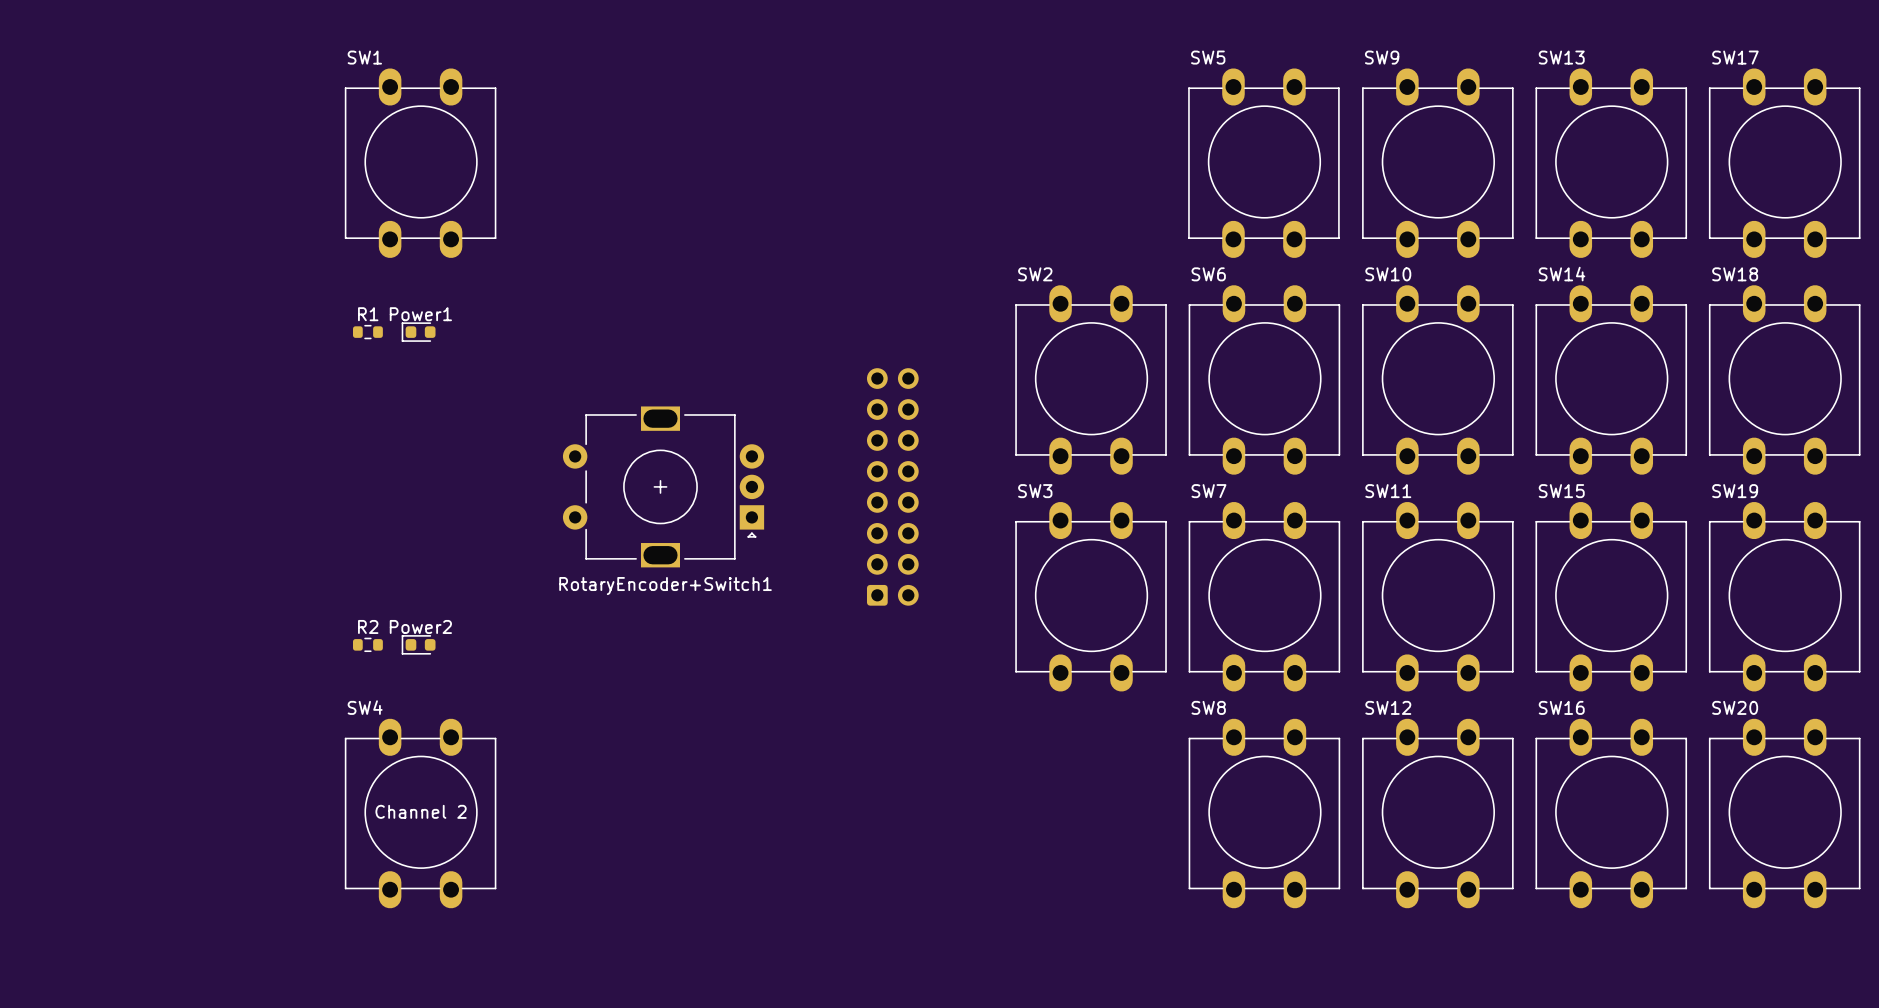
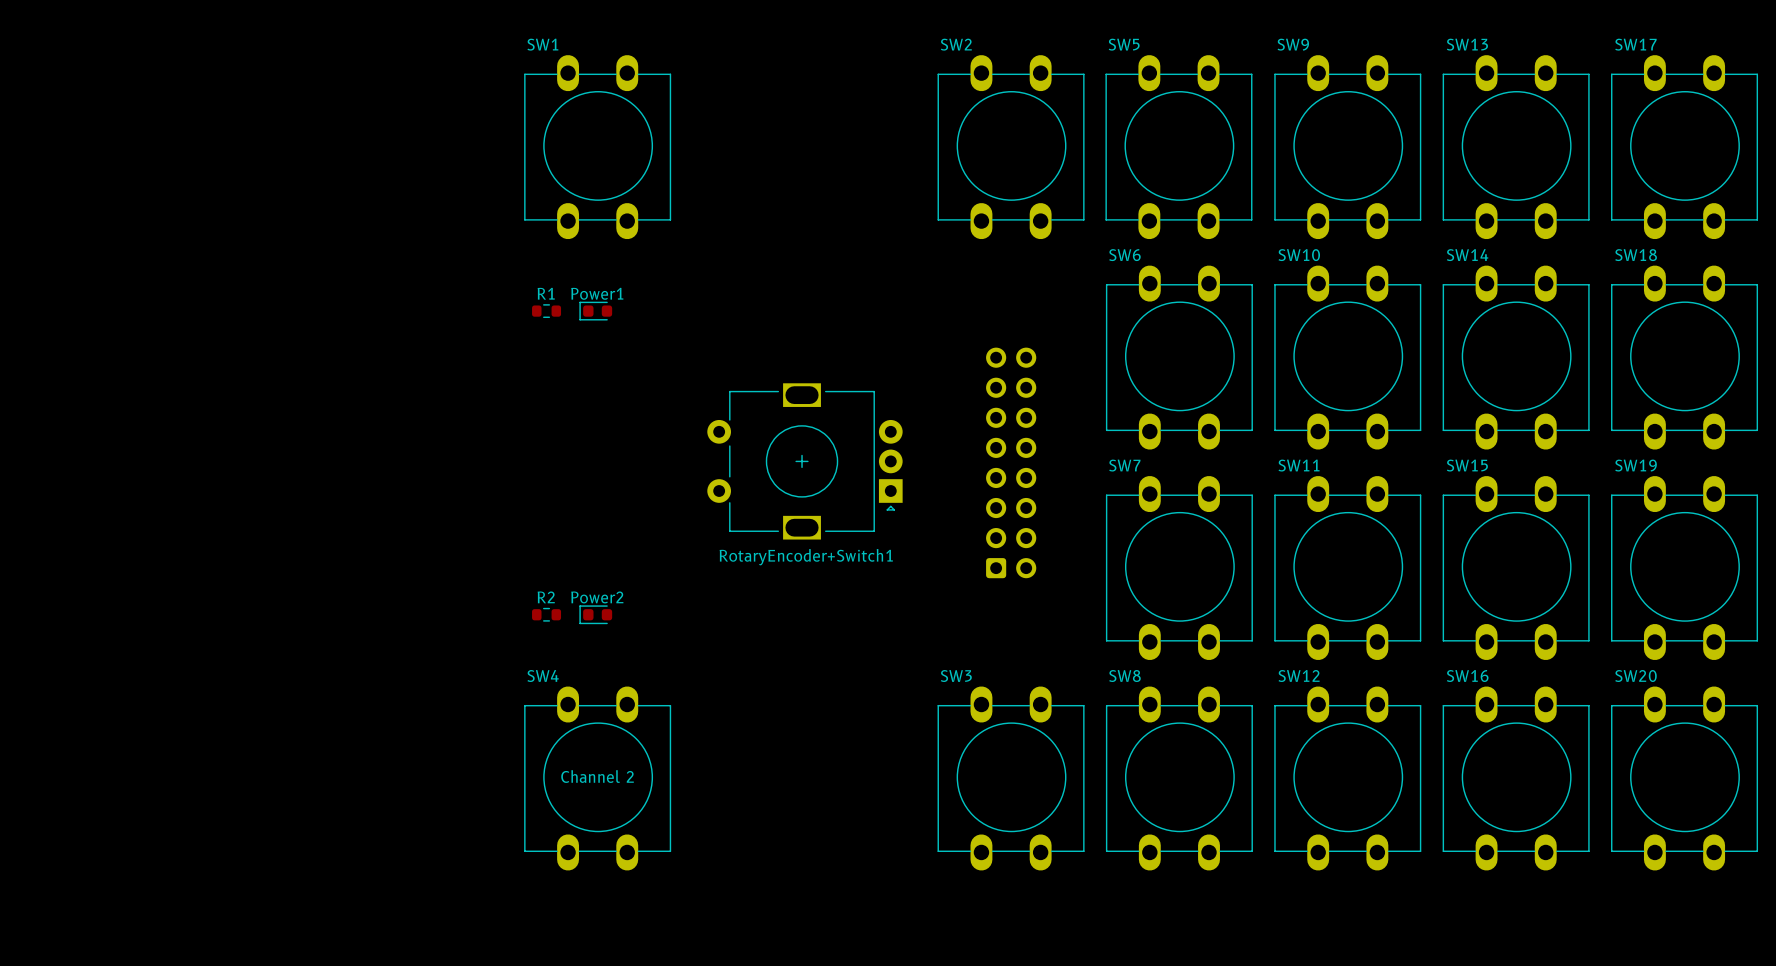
SW1 position: (420, 163) -> (597, 147)
R1 position: (367, 332) -> (546, 311)
Power1 position: (418, 332) -> (595, 311)
SW2 position: (1091, 379) -> (1011, 147)
RotaryEncoder+Switch1 position: (663, 486) -> (804, 461)
part position: (892, 486) -> (1011, 462)
SW3 position: (1091, 596) -> (1011, 778)
R2 position: (367, 644) -> (546, 614)
Power2 position: (418, 644) -> (595, 614)
SW4 position: (420, 813) -> (597, 778)

